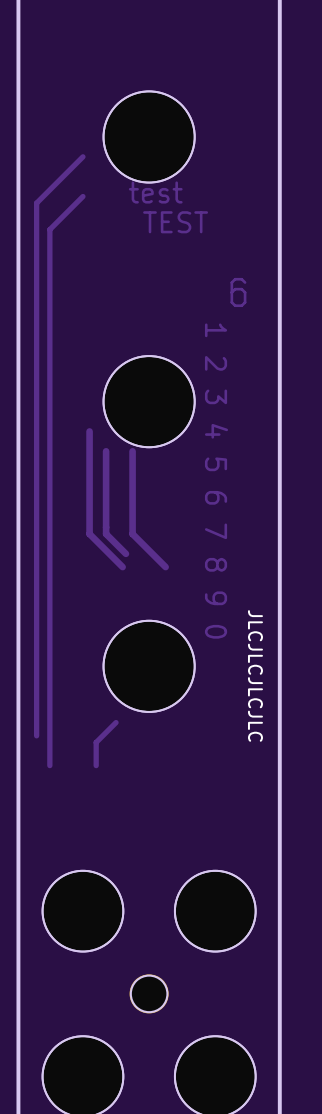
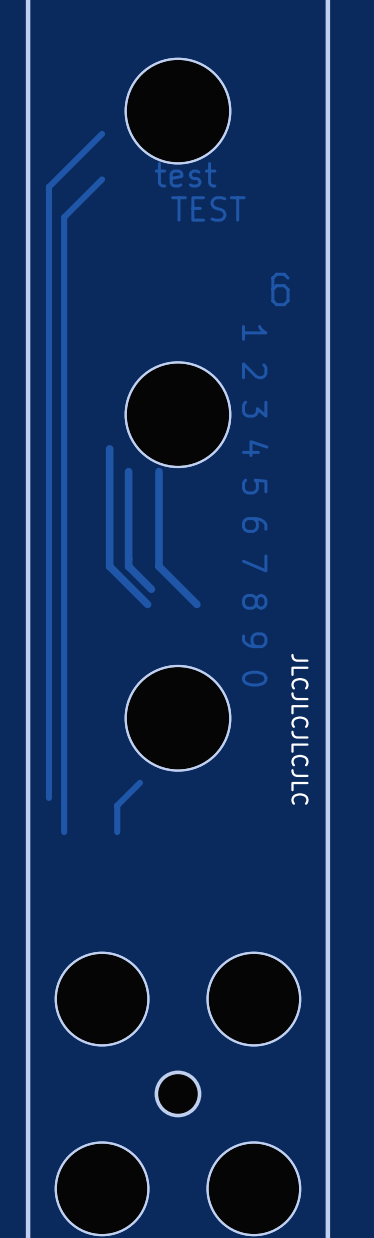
part footprint: [129, 974, 169, 1014] -> [155, 1071, 201, 1117]

